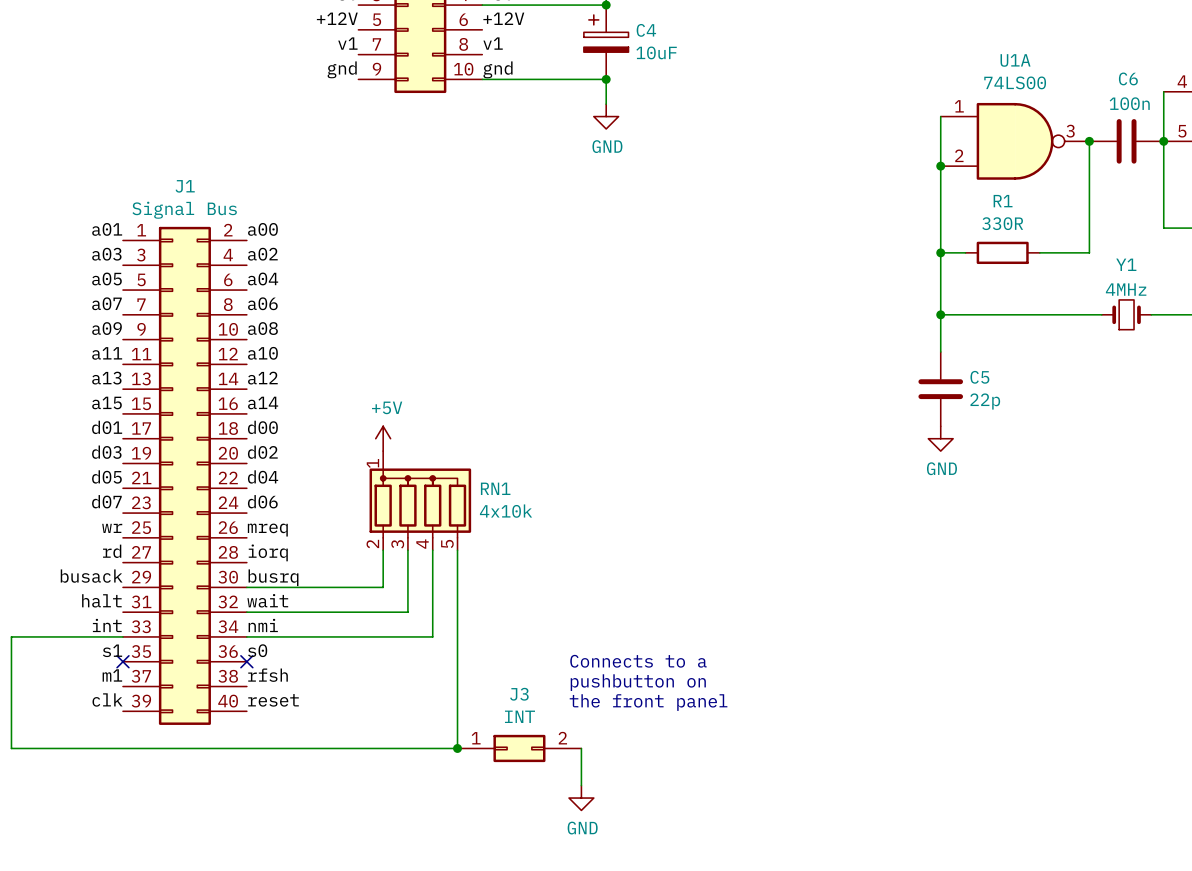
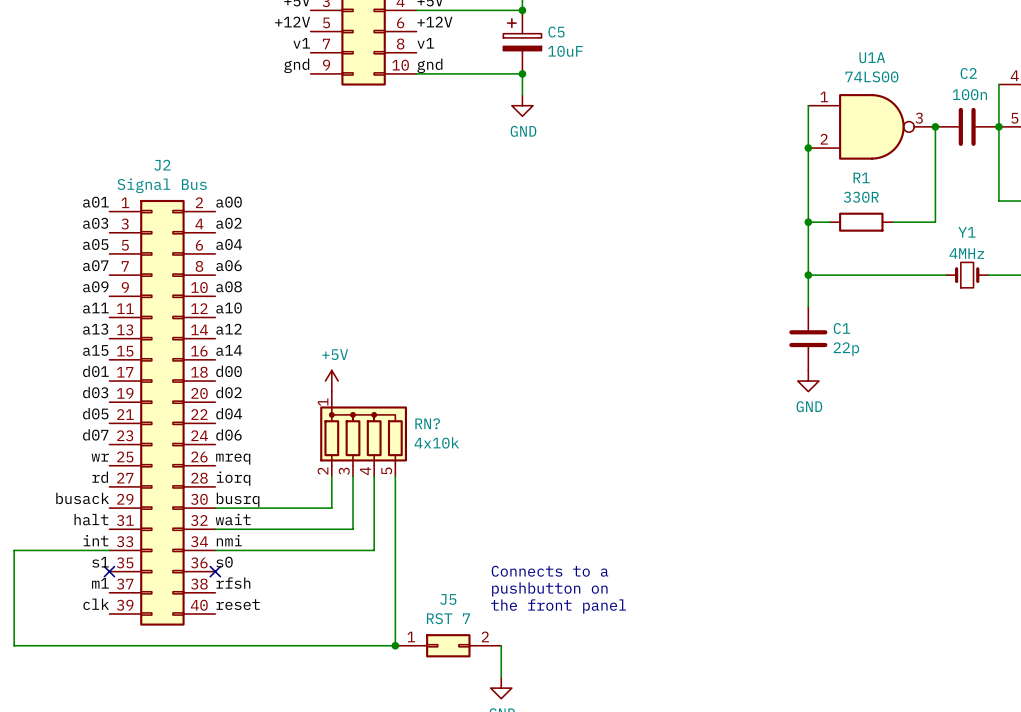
C4 name: C4 (646, 30) -> C5 (556, 32)
C6 name: C6 (1128, 78) -> C2 (968, 73)
J1 name: J1 (185, 186) -> J2 (162, 165)
C5 name: C5 (979, 377) -> C1 (841, 328)
RN1 name: RN1 (495, 488) -> RN? (427, 423)
J3 name: J3 (519, 694) -> J5 (448, 599)
J3 value: INT (519, 716) -> RST 7 (448, 618)

